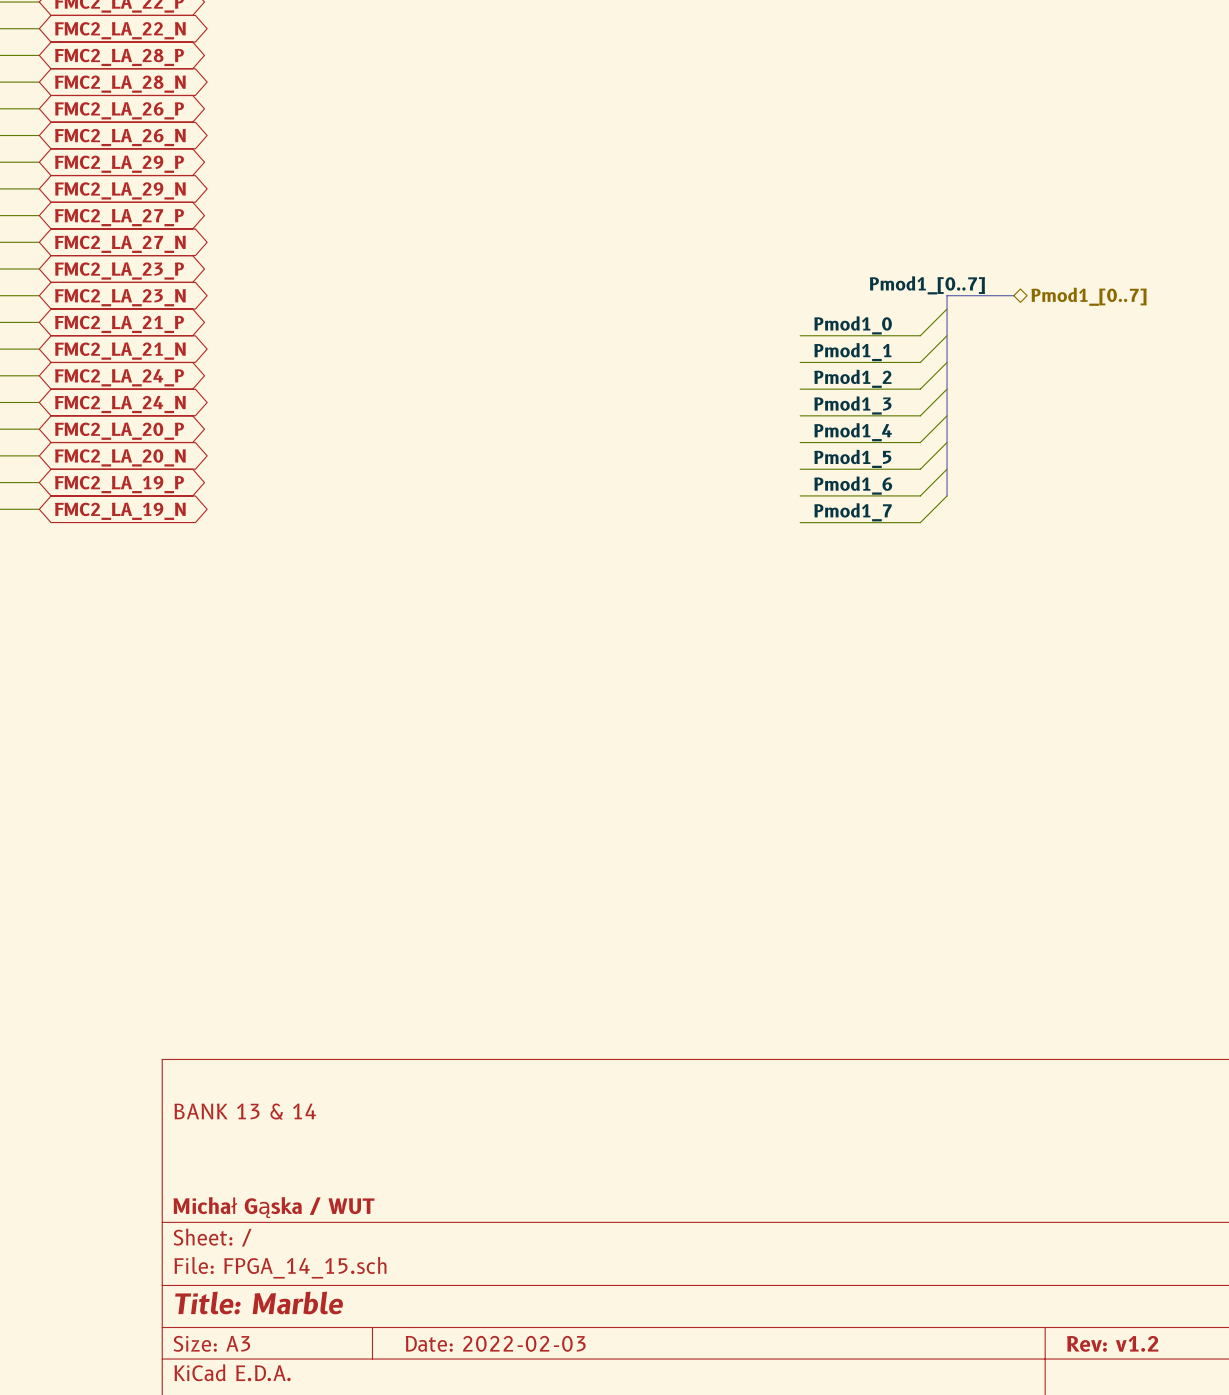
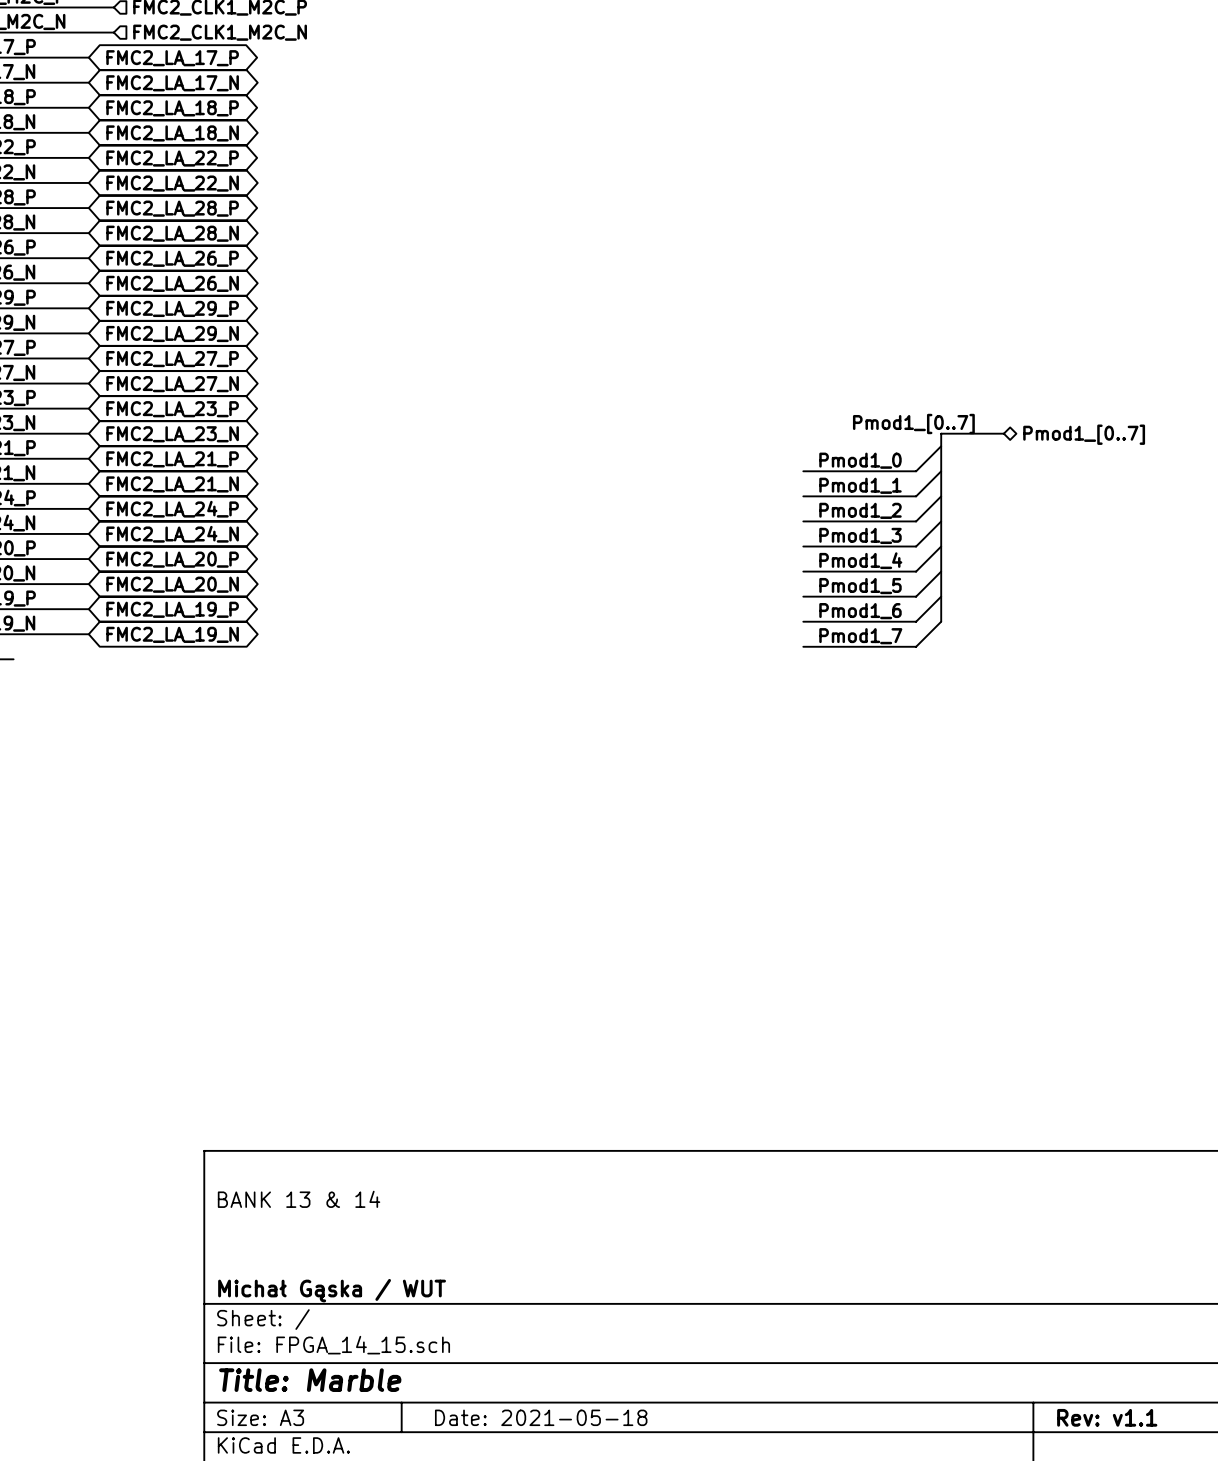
title block: Date: 2022-02-03 (495, 1343) -> Date: 2021-05-18 (541, 1417)
title block: Rev: v1.2 (1112, 1343) -> Rev: v1.1 (1107, 1417)

